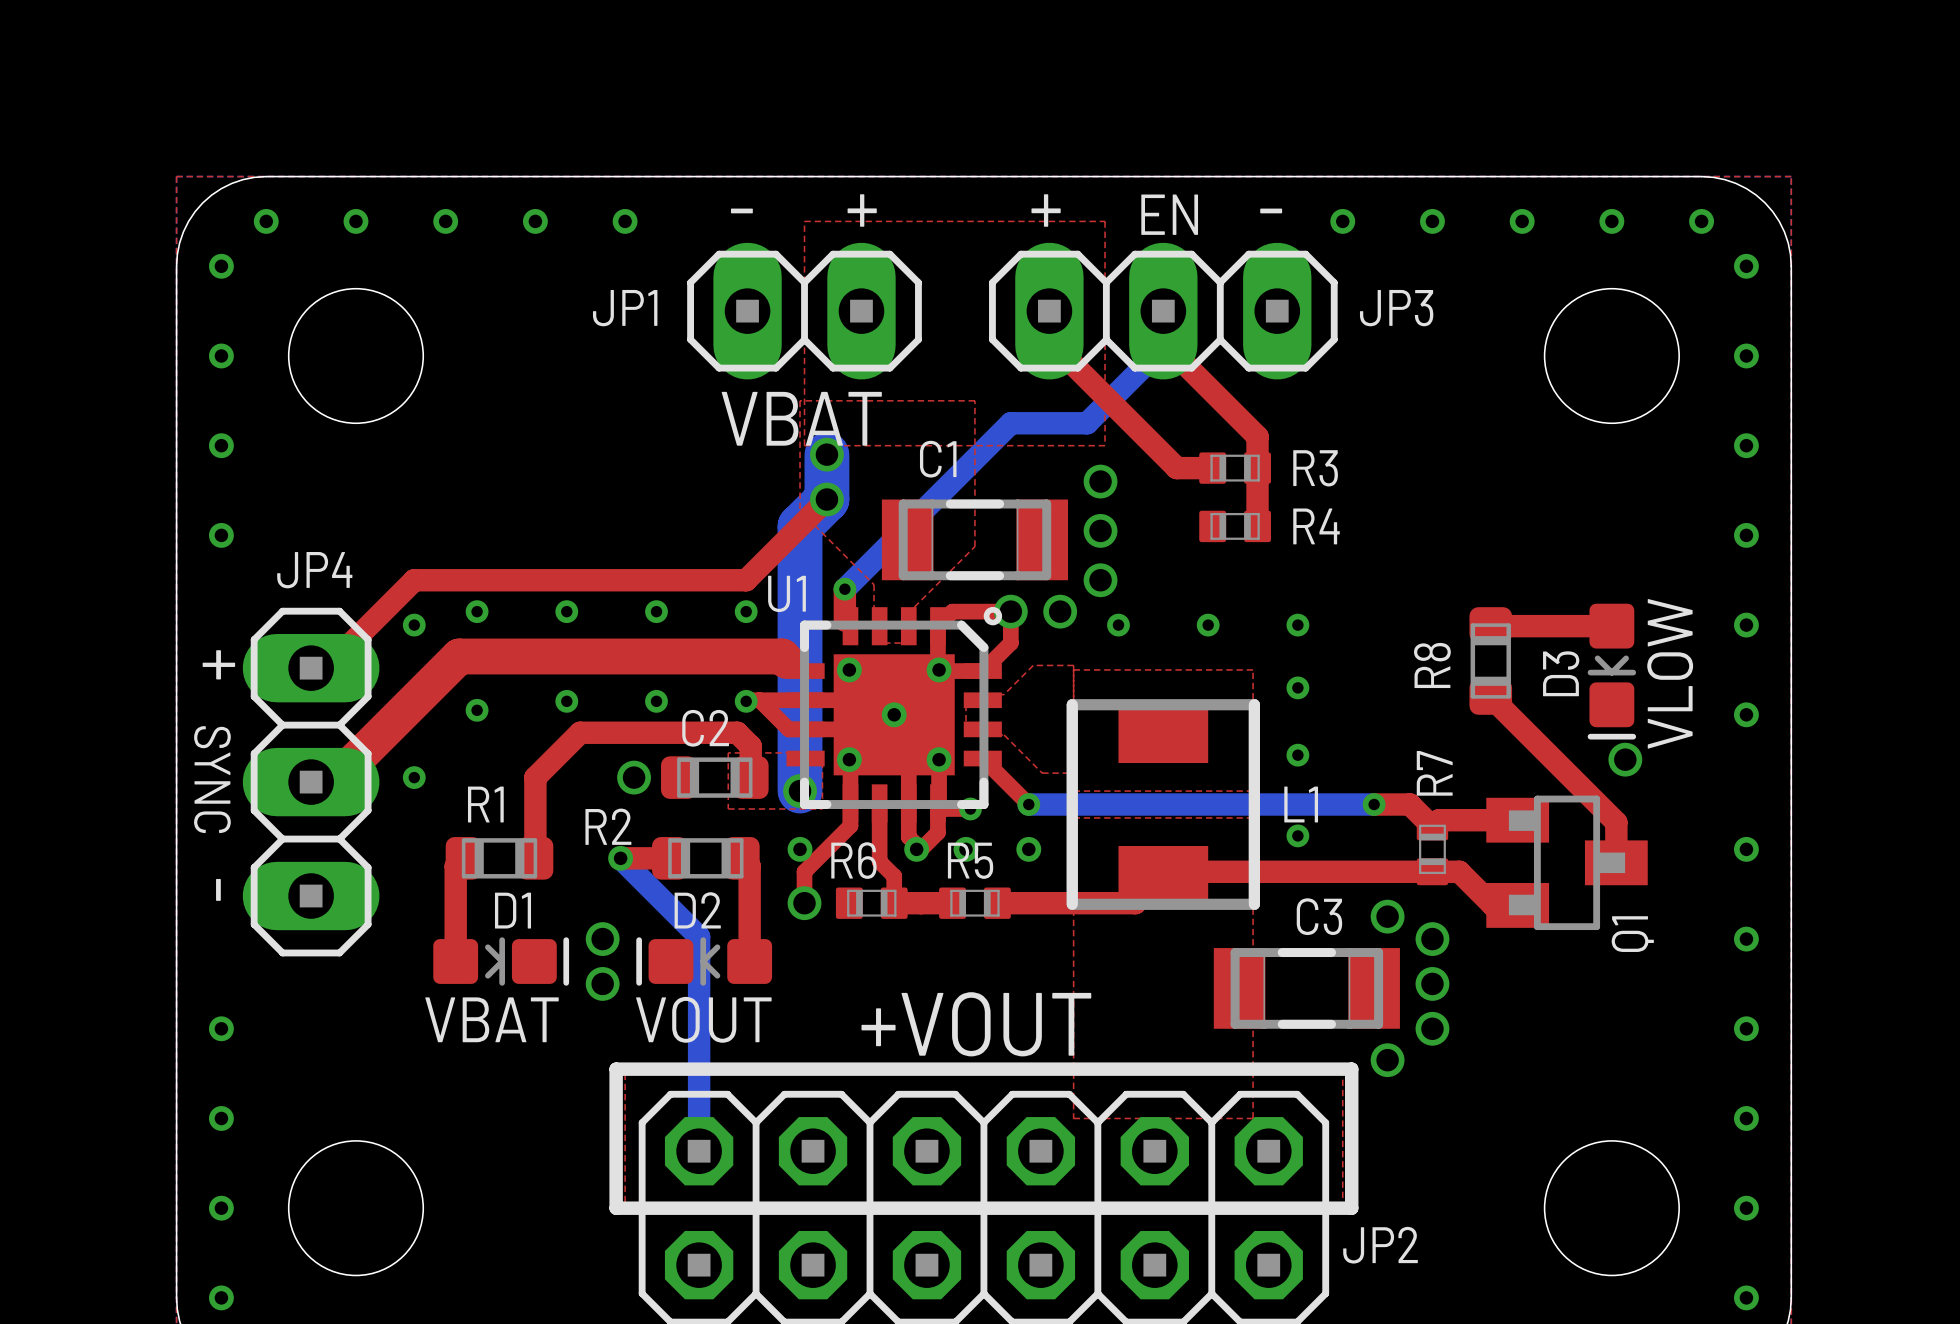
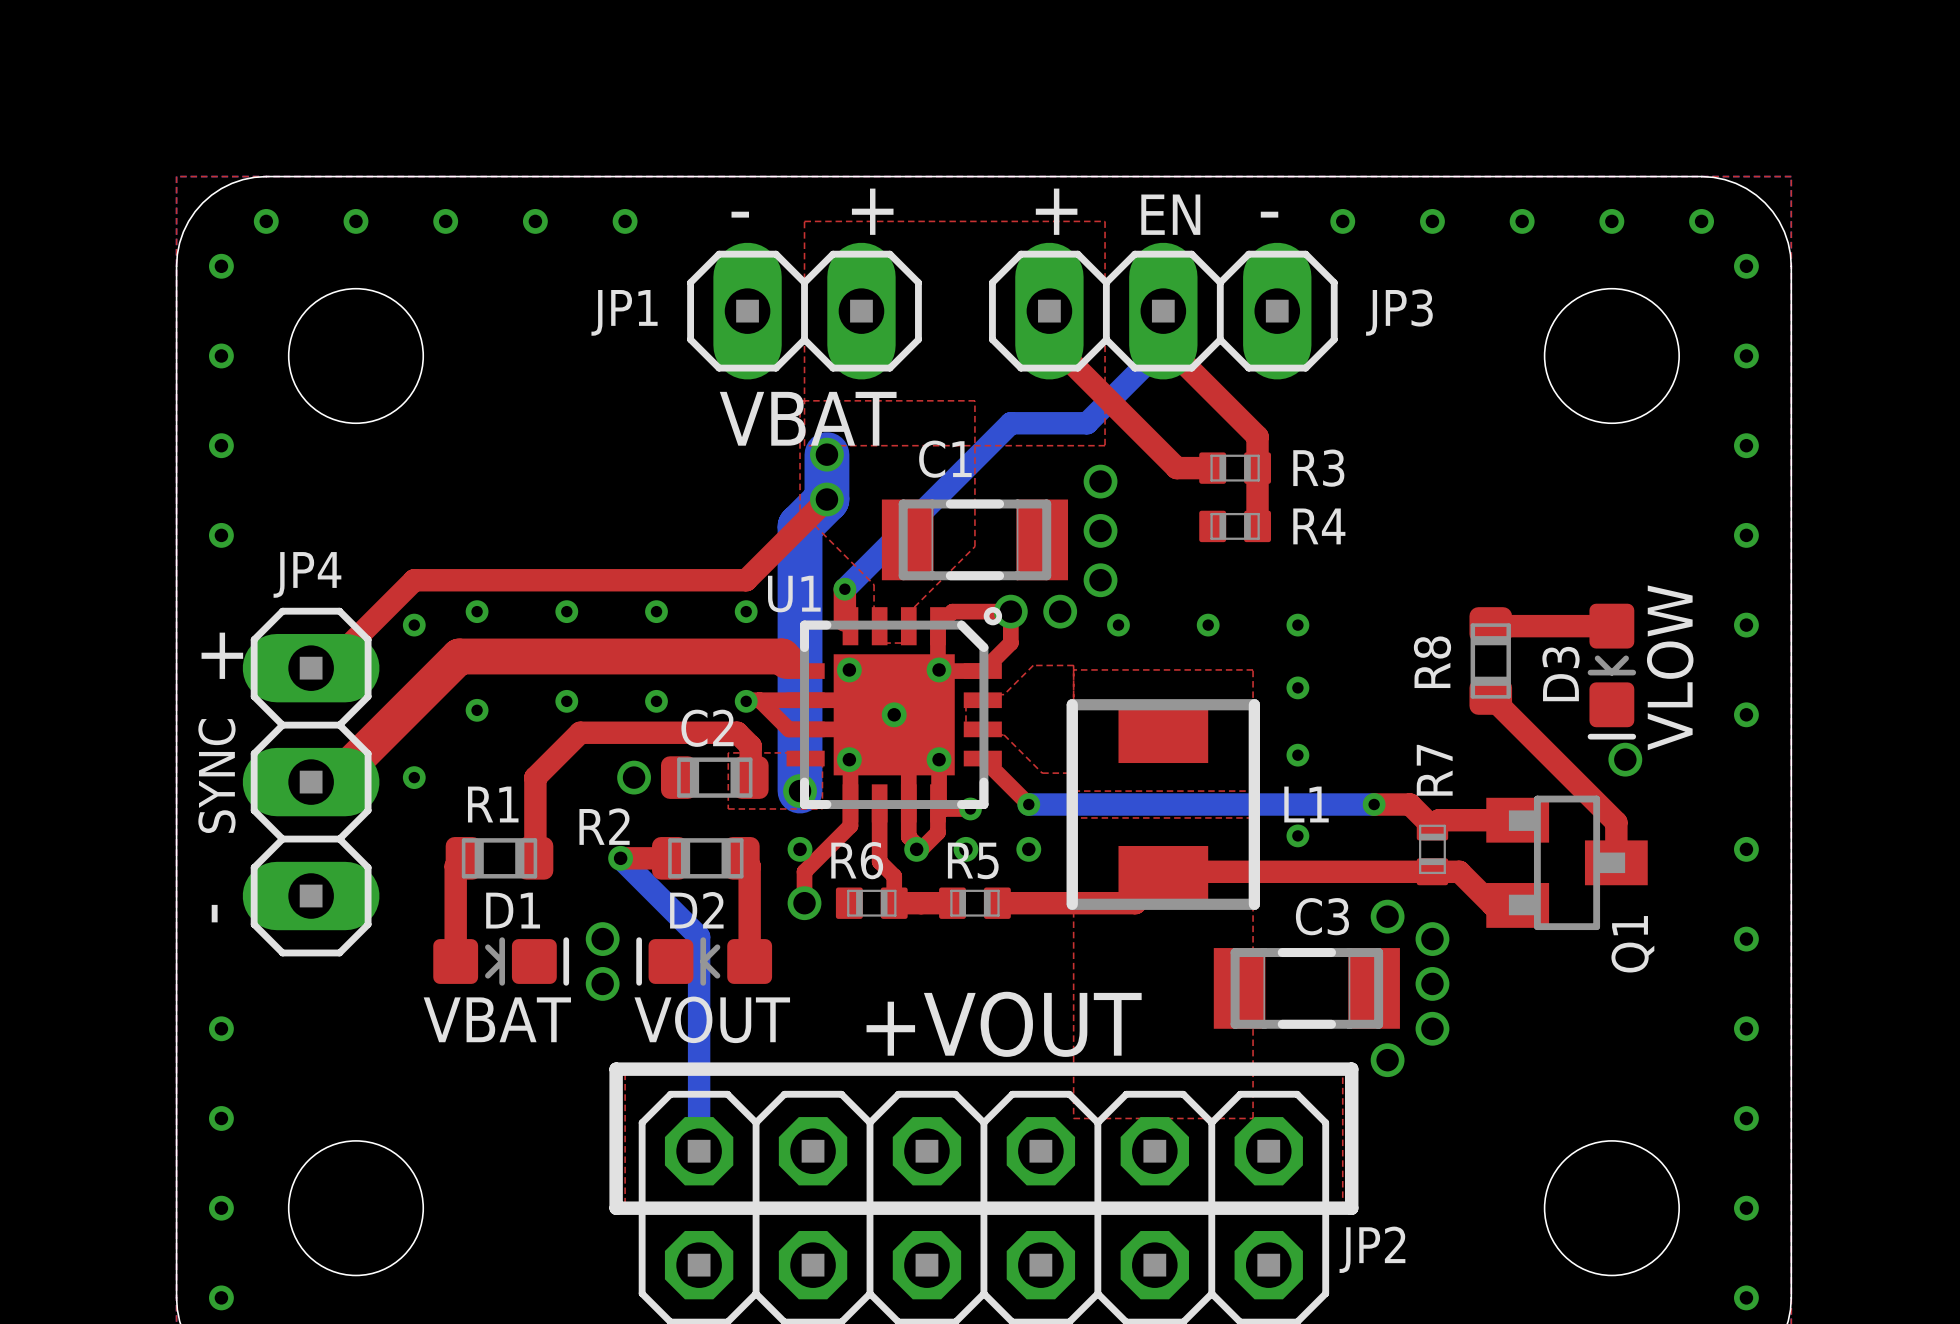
text rotation: 0° (218, 664) -> 90° counterclockwise (222, 655)
text rotation: 0° (212, 779) -> 180° (216, 776)
text rotation: 0° (218, 889) -> 180° (214, 913)

